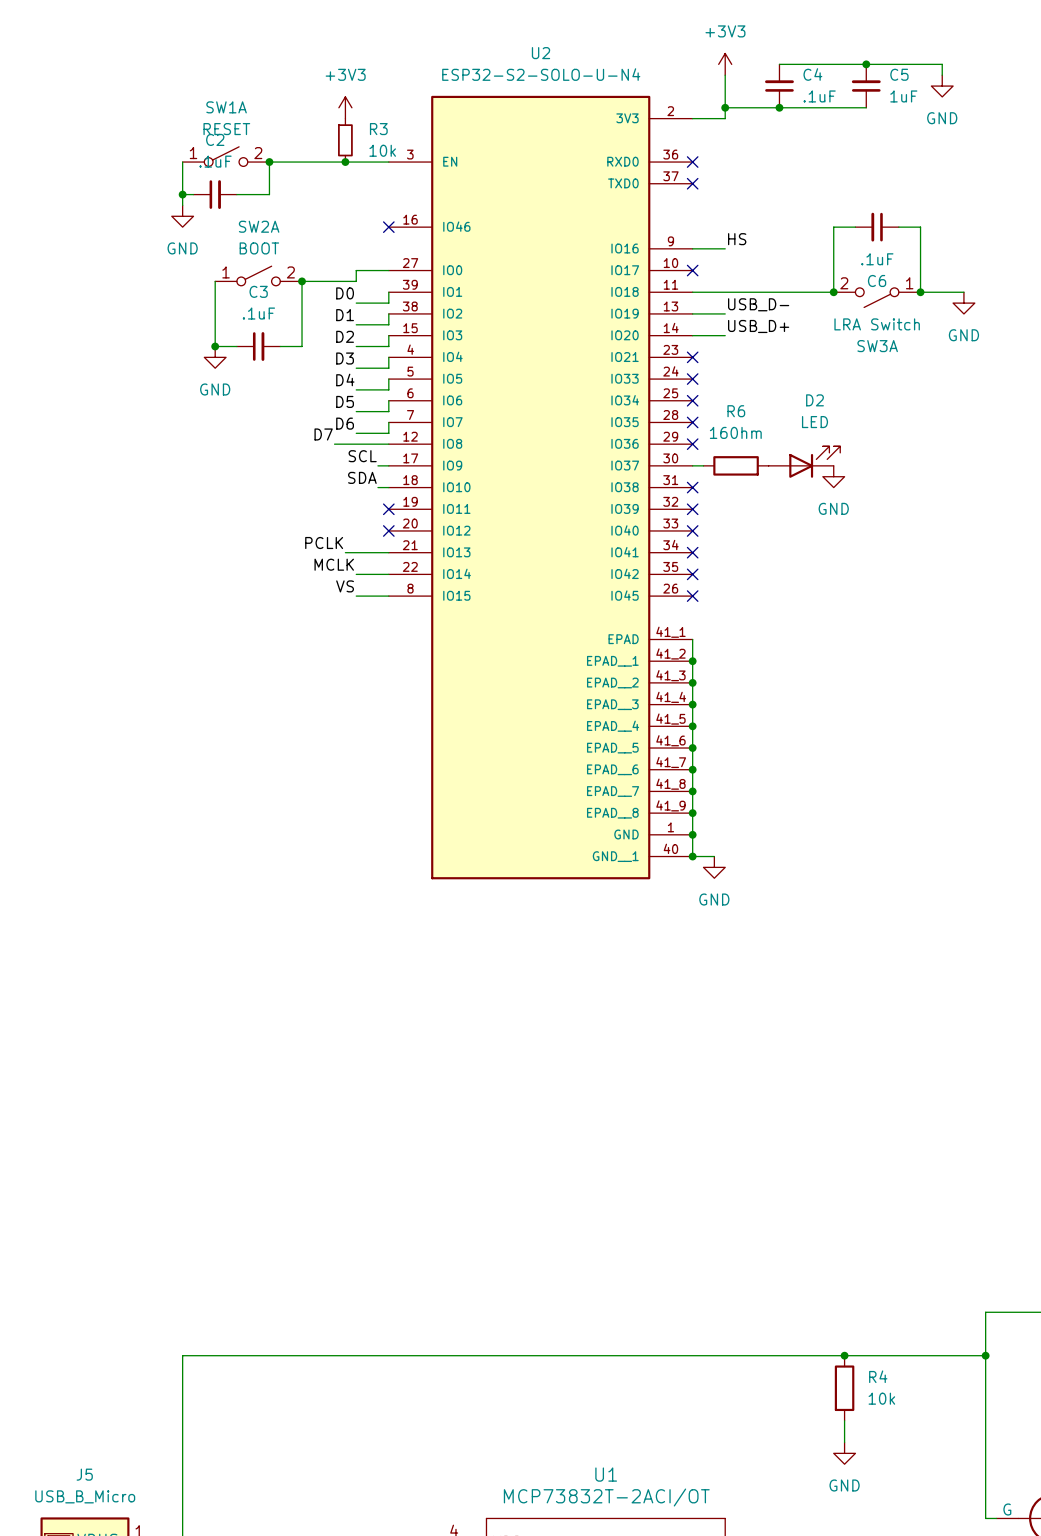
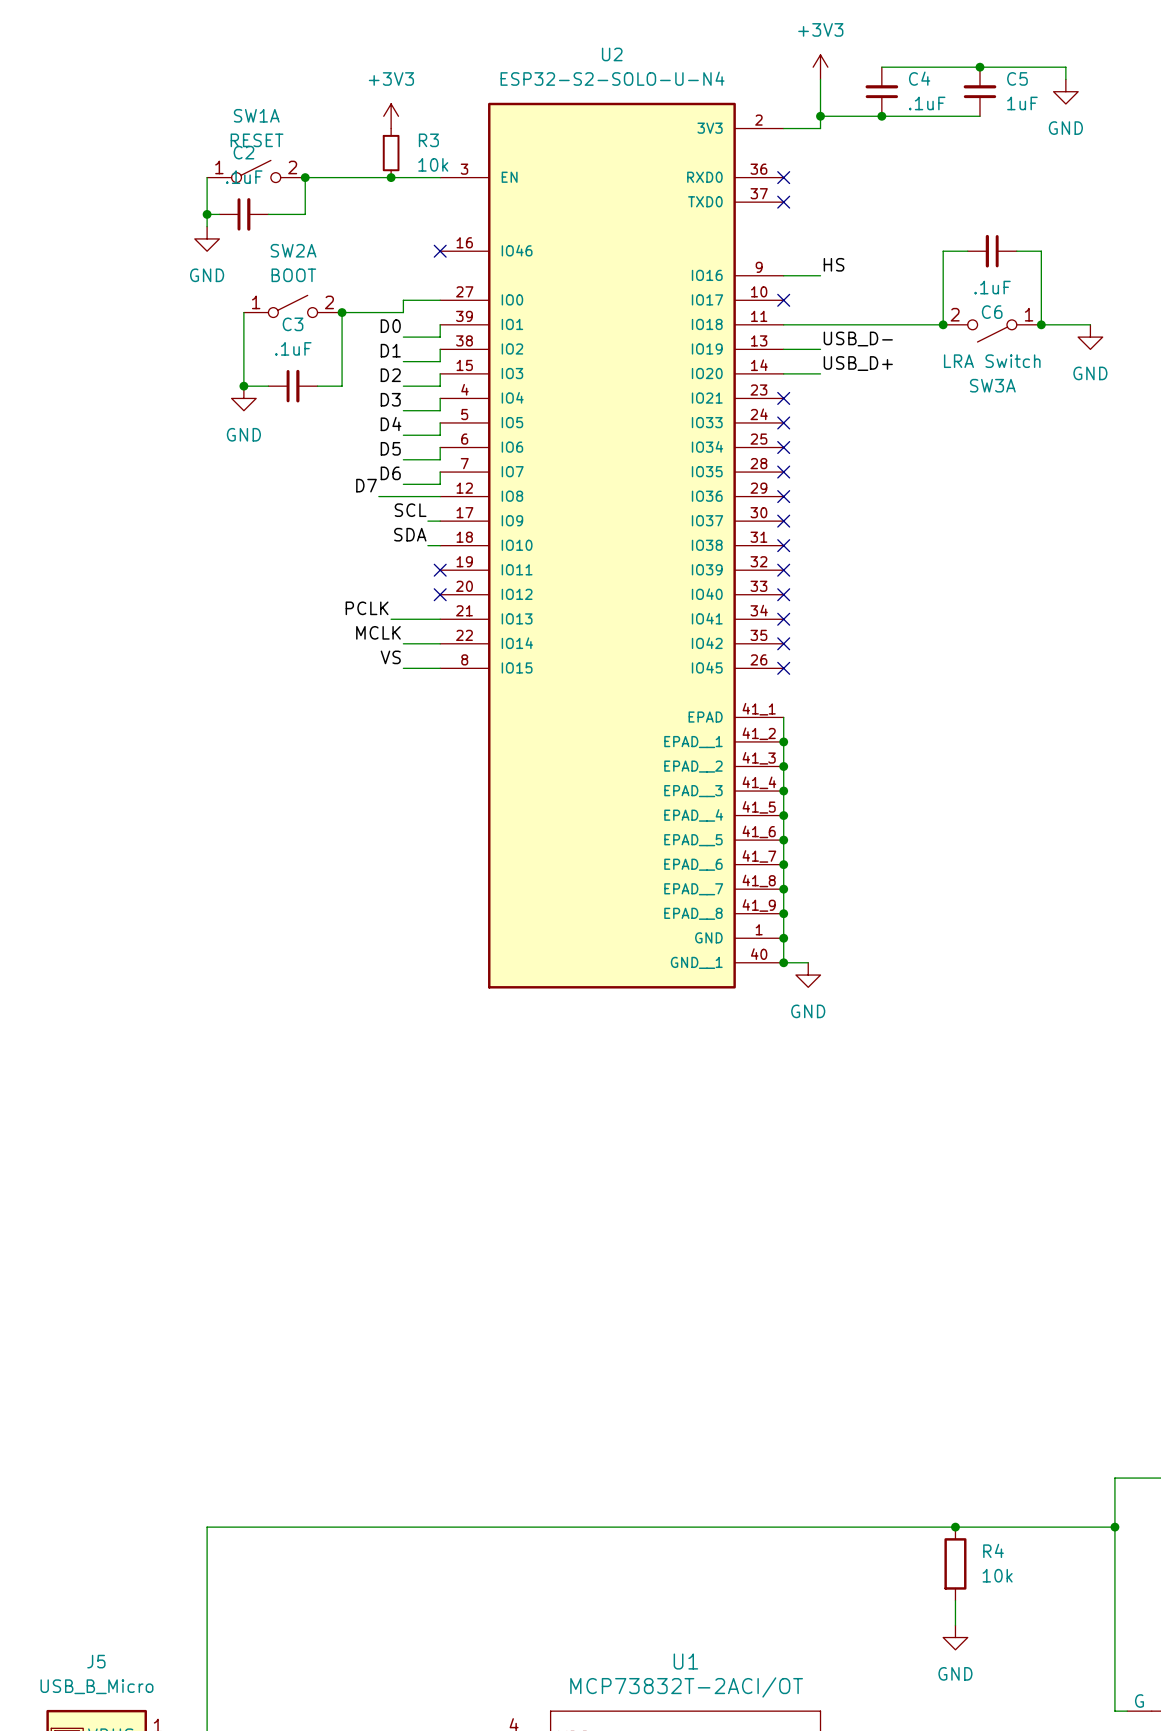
D2: LED (804, 462) -> none
wire: (692, 465) (703, 465) -> none
no-connect mark: none -> (783, 521)
R6: 160hm (736, 465) -> none
power symbol: GND (833, 476) -> none

